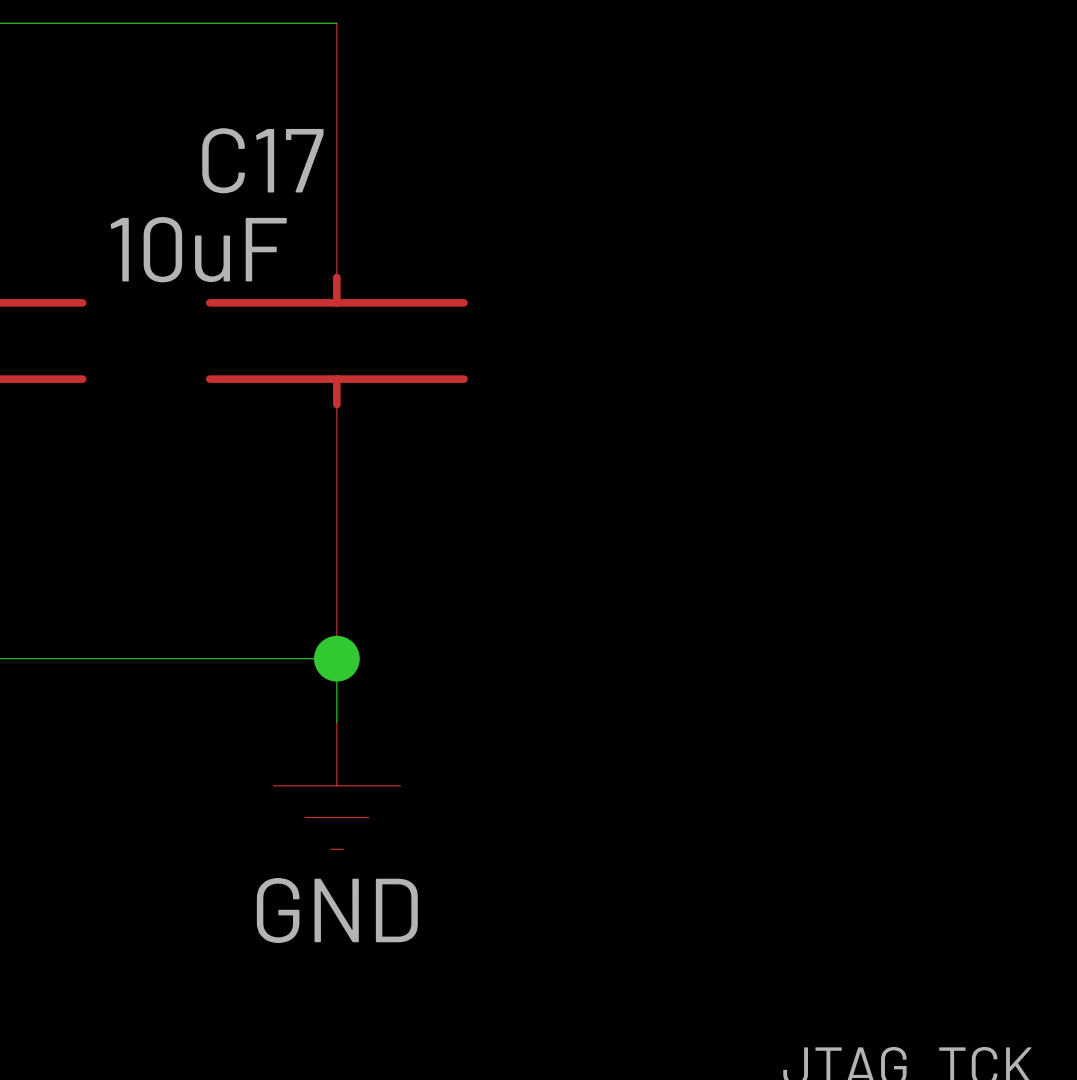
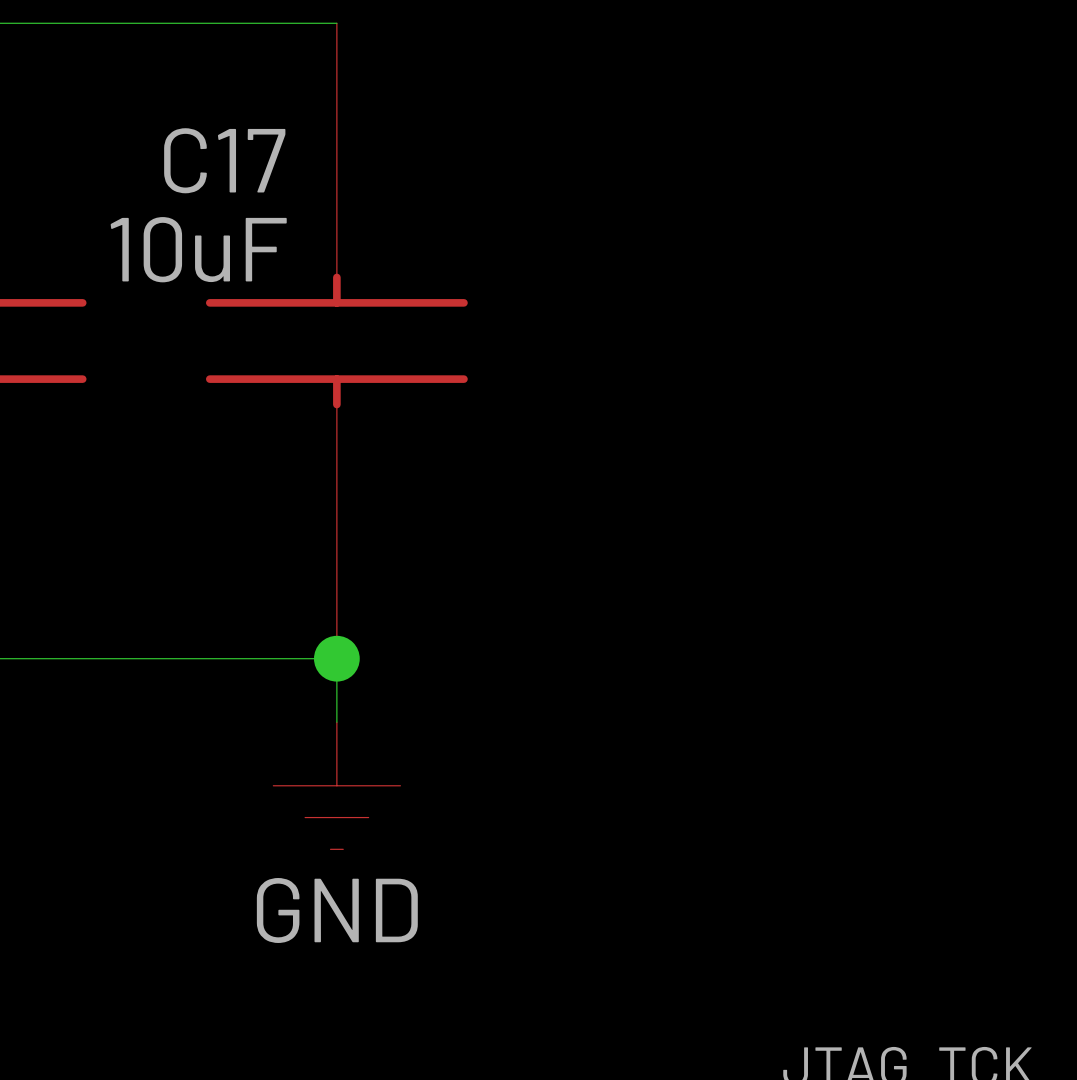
C17 name position: C17 (262, 160) -> C17 (224, 160)

